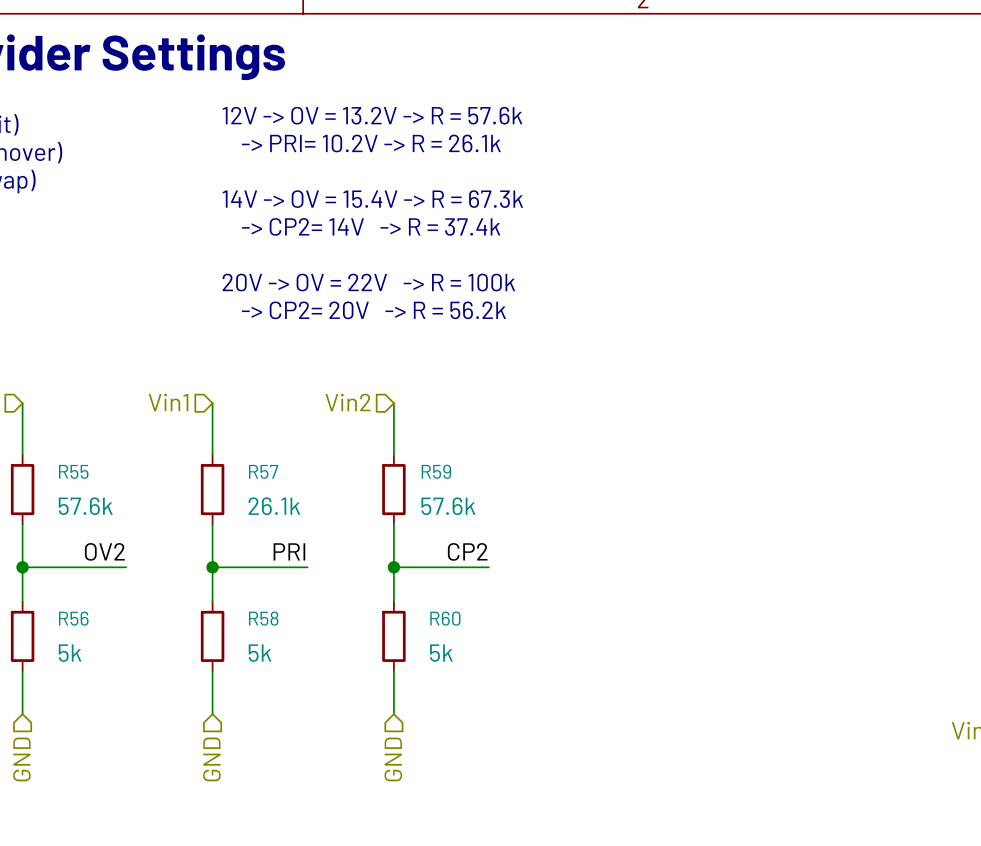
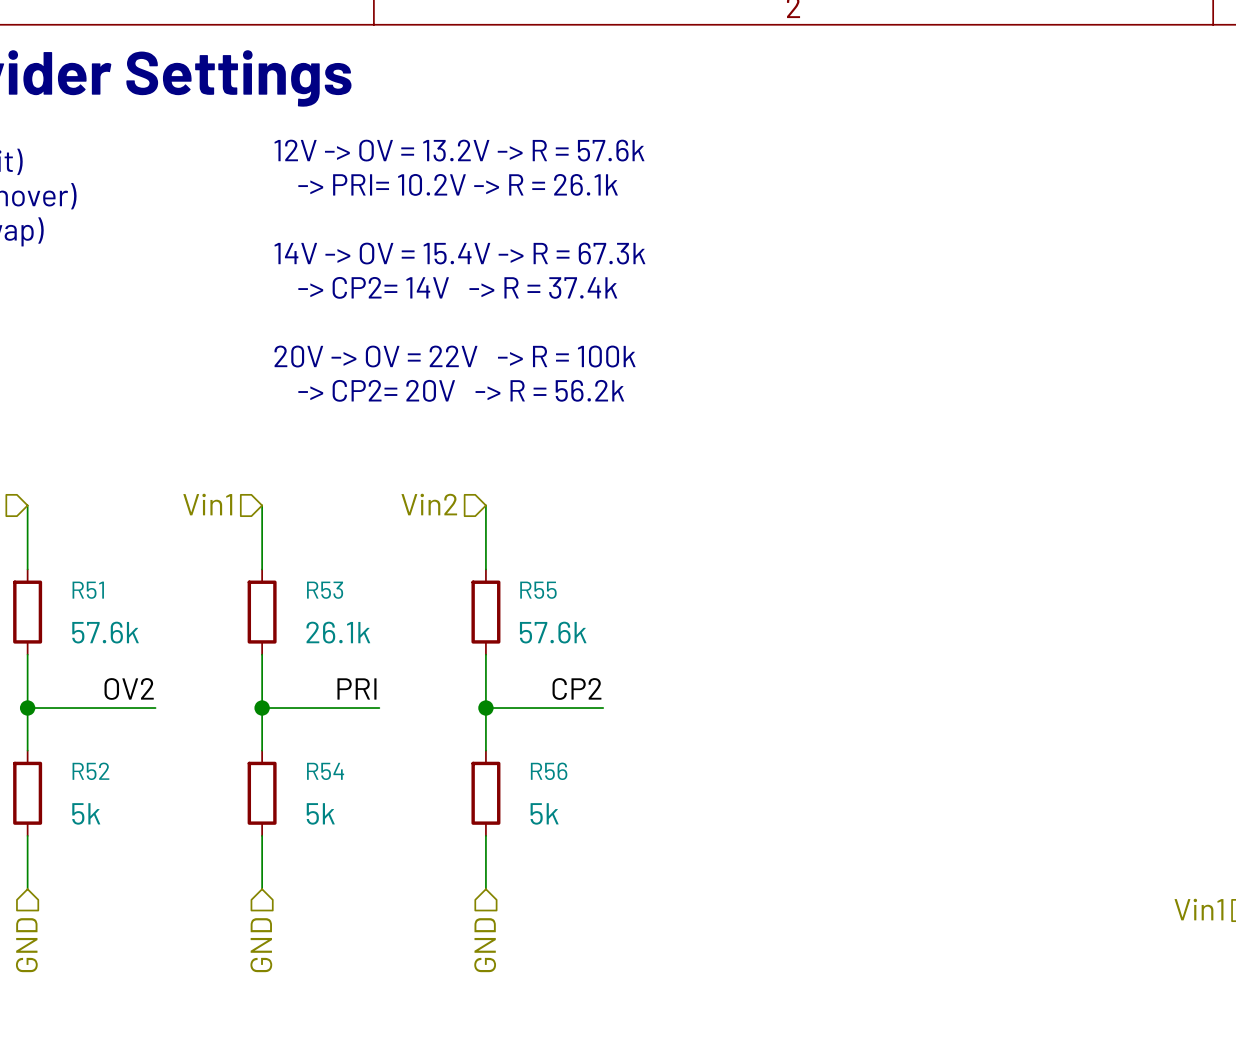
R55 name: R55 (73, 471) -> R51 (88, 590)
R57 name: R57 (263, 471) -> R53 (325, 590)
R59 name: R59 (436, 471) -> R55 (538, 590)
R56 name: R56 (73, 618) -> R52 (90, 771)
R58 name: R58 (263, 618) -> R54 (325, 771)
R60 name: R60 (445, 618) -> R56 (549, 771)

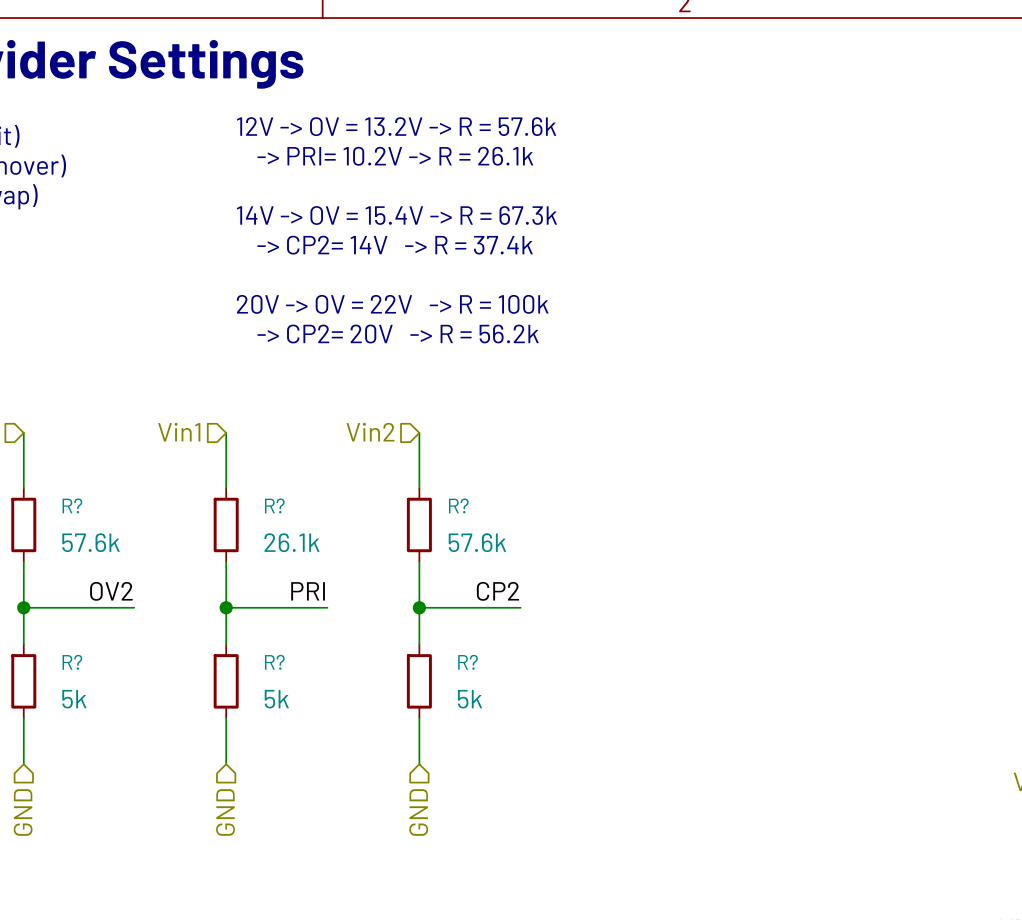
R51 name: R51 (88, 590) -> R? (72, 505)
R53 name: R53 (325, 590) -> R? (274, 505)
R55 name: R55 (538, 590) -> R? (458, 505)
R52 name: R52 (90, 771) -> R? (72, 662)
R54 name: R54 (325, 771) -> R? (274, 662)
R56 name: R56 (549, 771) -> R? (468, 662)

